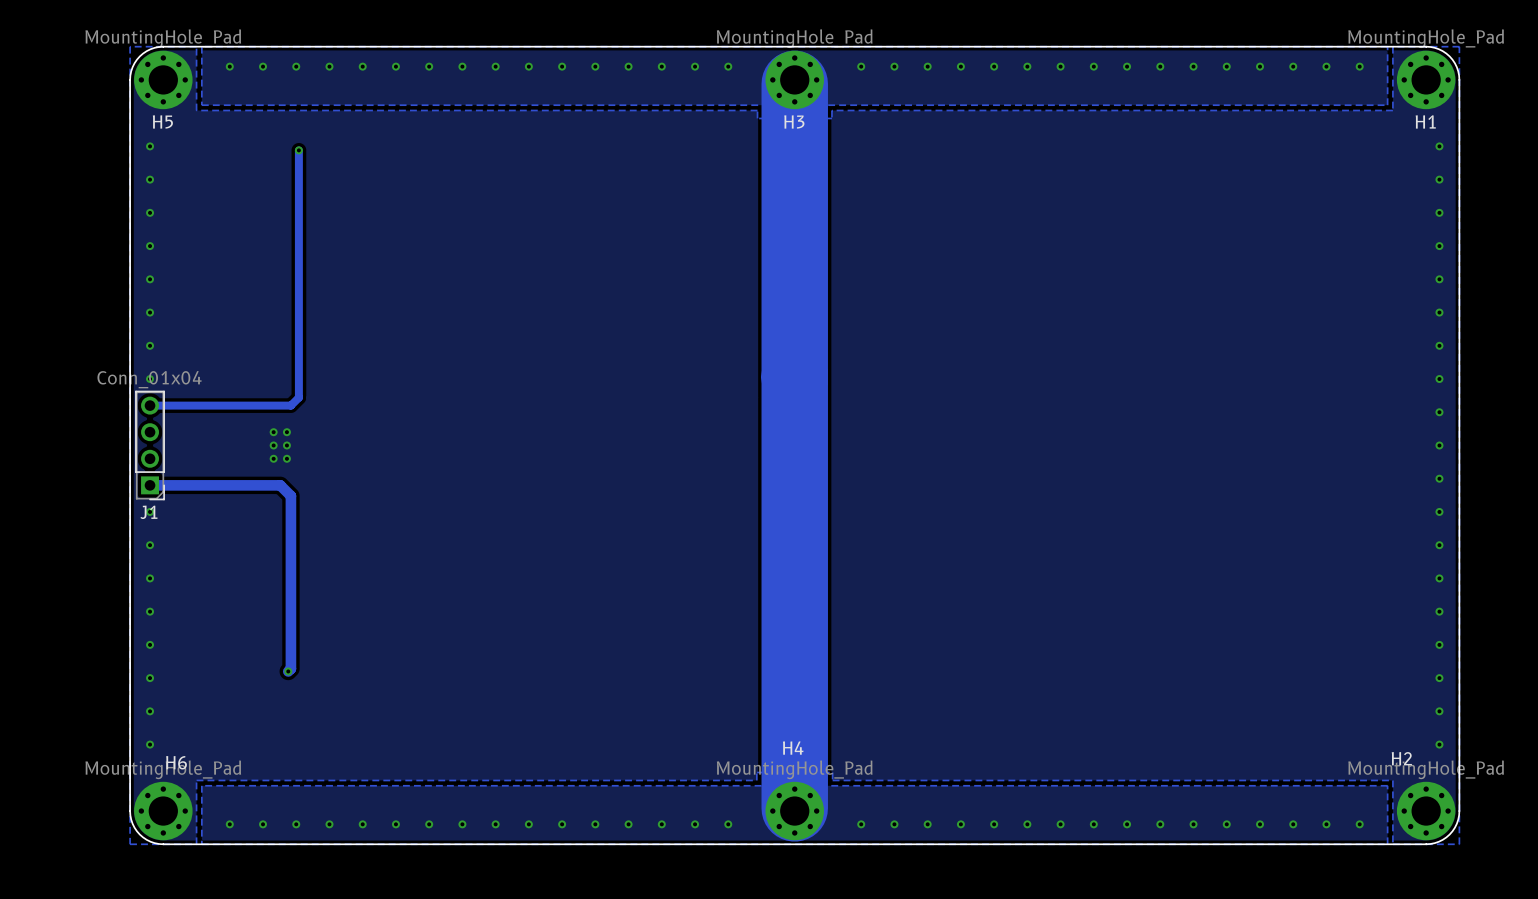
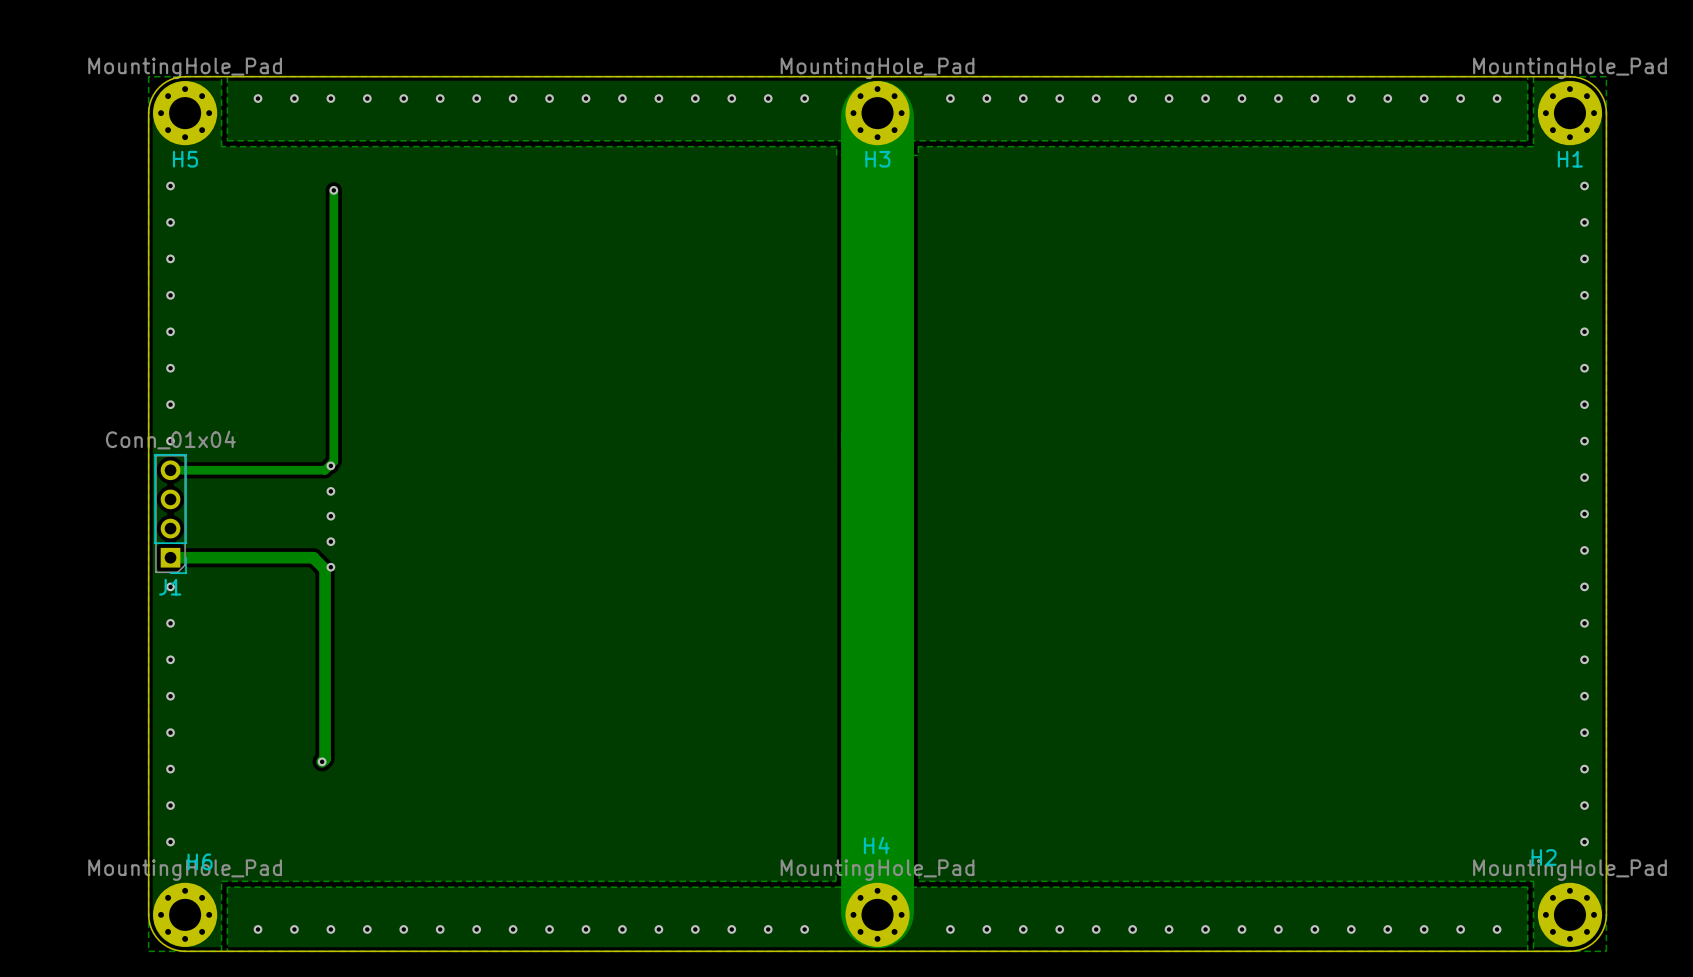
via: none -> (330, 465)
via: none -> (330, 491)
via: (273, 432) -> none
via: (286, 432) -> none
via: (273, 445) -> none
via: (286, 445) -> none
via: none -> (330, 516)
via: (273, 458) -> none
via: (286, 458) -> none
via: none -> (330, 541)
via: none -> (330, 567)

